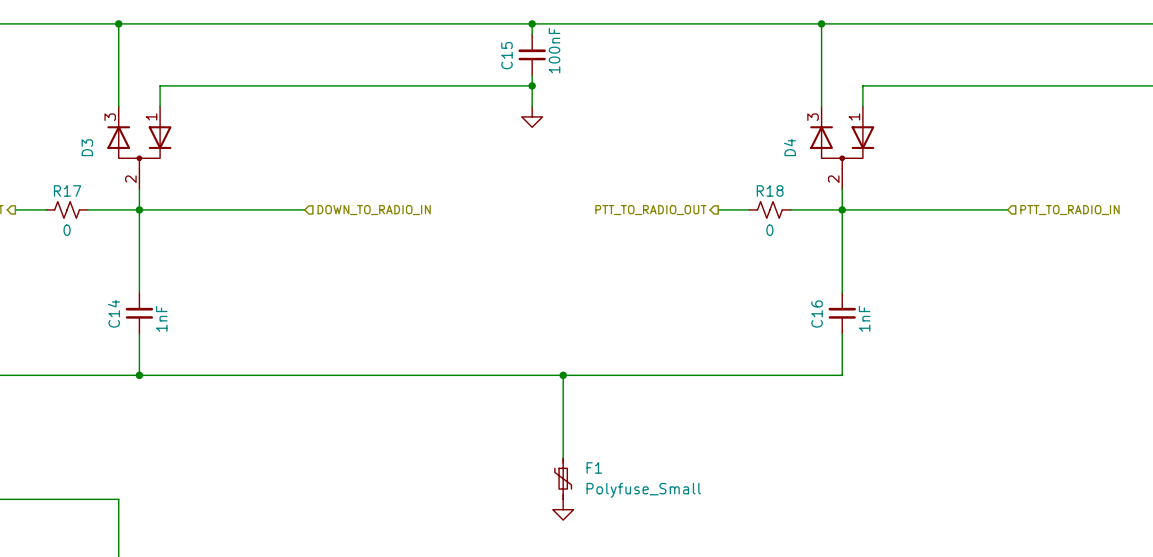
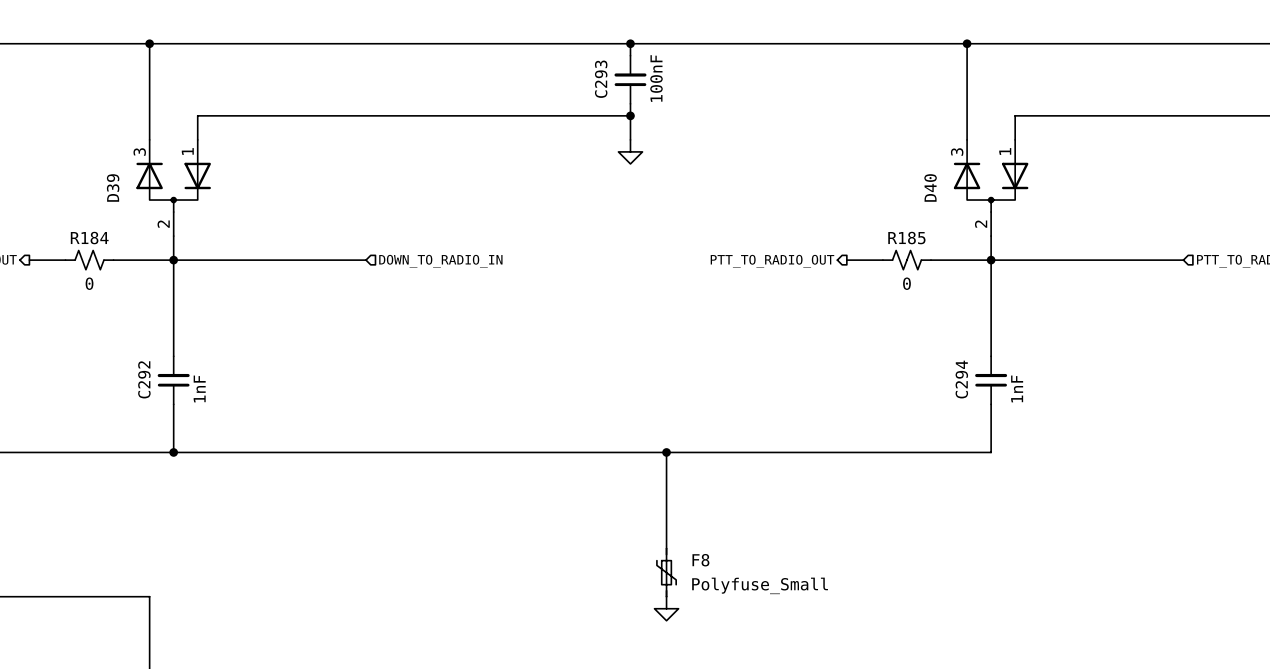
C15 name: C15 (506, 55) -> C293 (601, 79)
D3 name: D3 (87, 147) -> D39 (113, 188)
D4 name: D4 (789, 147) -> D40 (930, 187)
R17 name: R17 (67, 190) -> R184 (89, 238)
R18 name: R18 (770, 190) -> R185 (906, 238)
C14 name: C14 (113, 313) -> C292 (144, 379)
C16 name: C16 (817, 314) -> C294 (961, 379)
F1 name: F1 (594, 467) -> F8 (700, 560)

